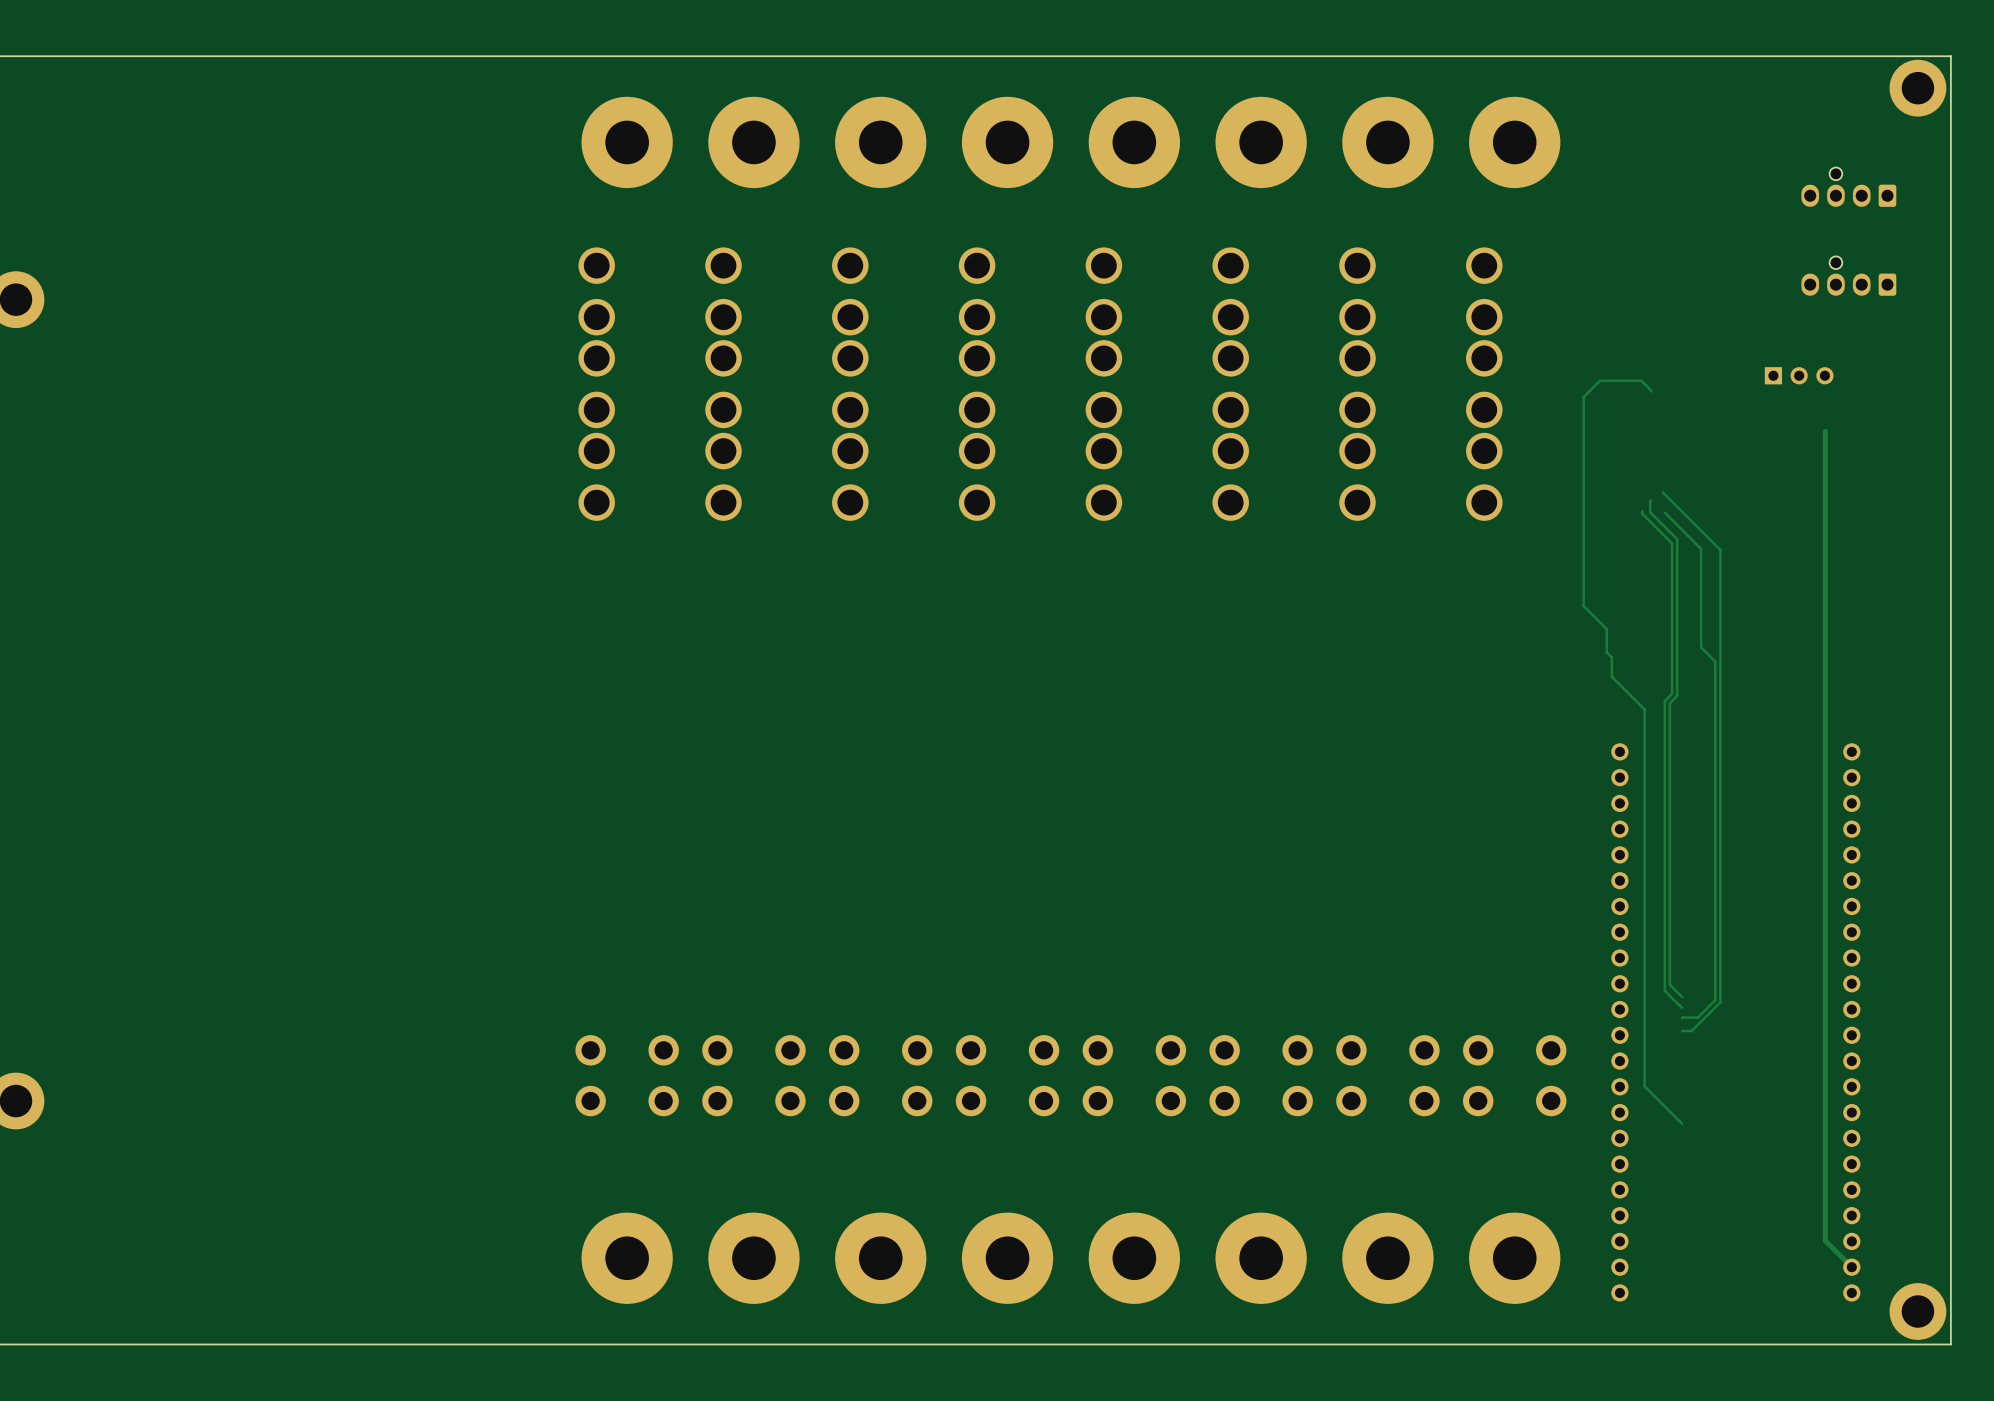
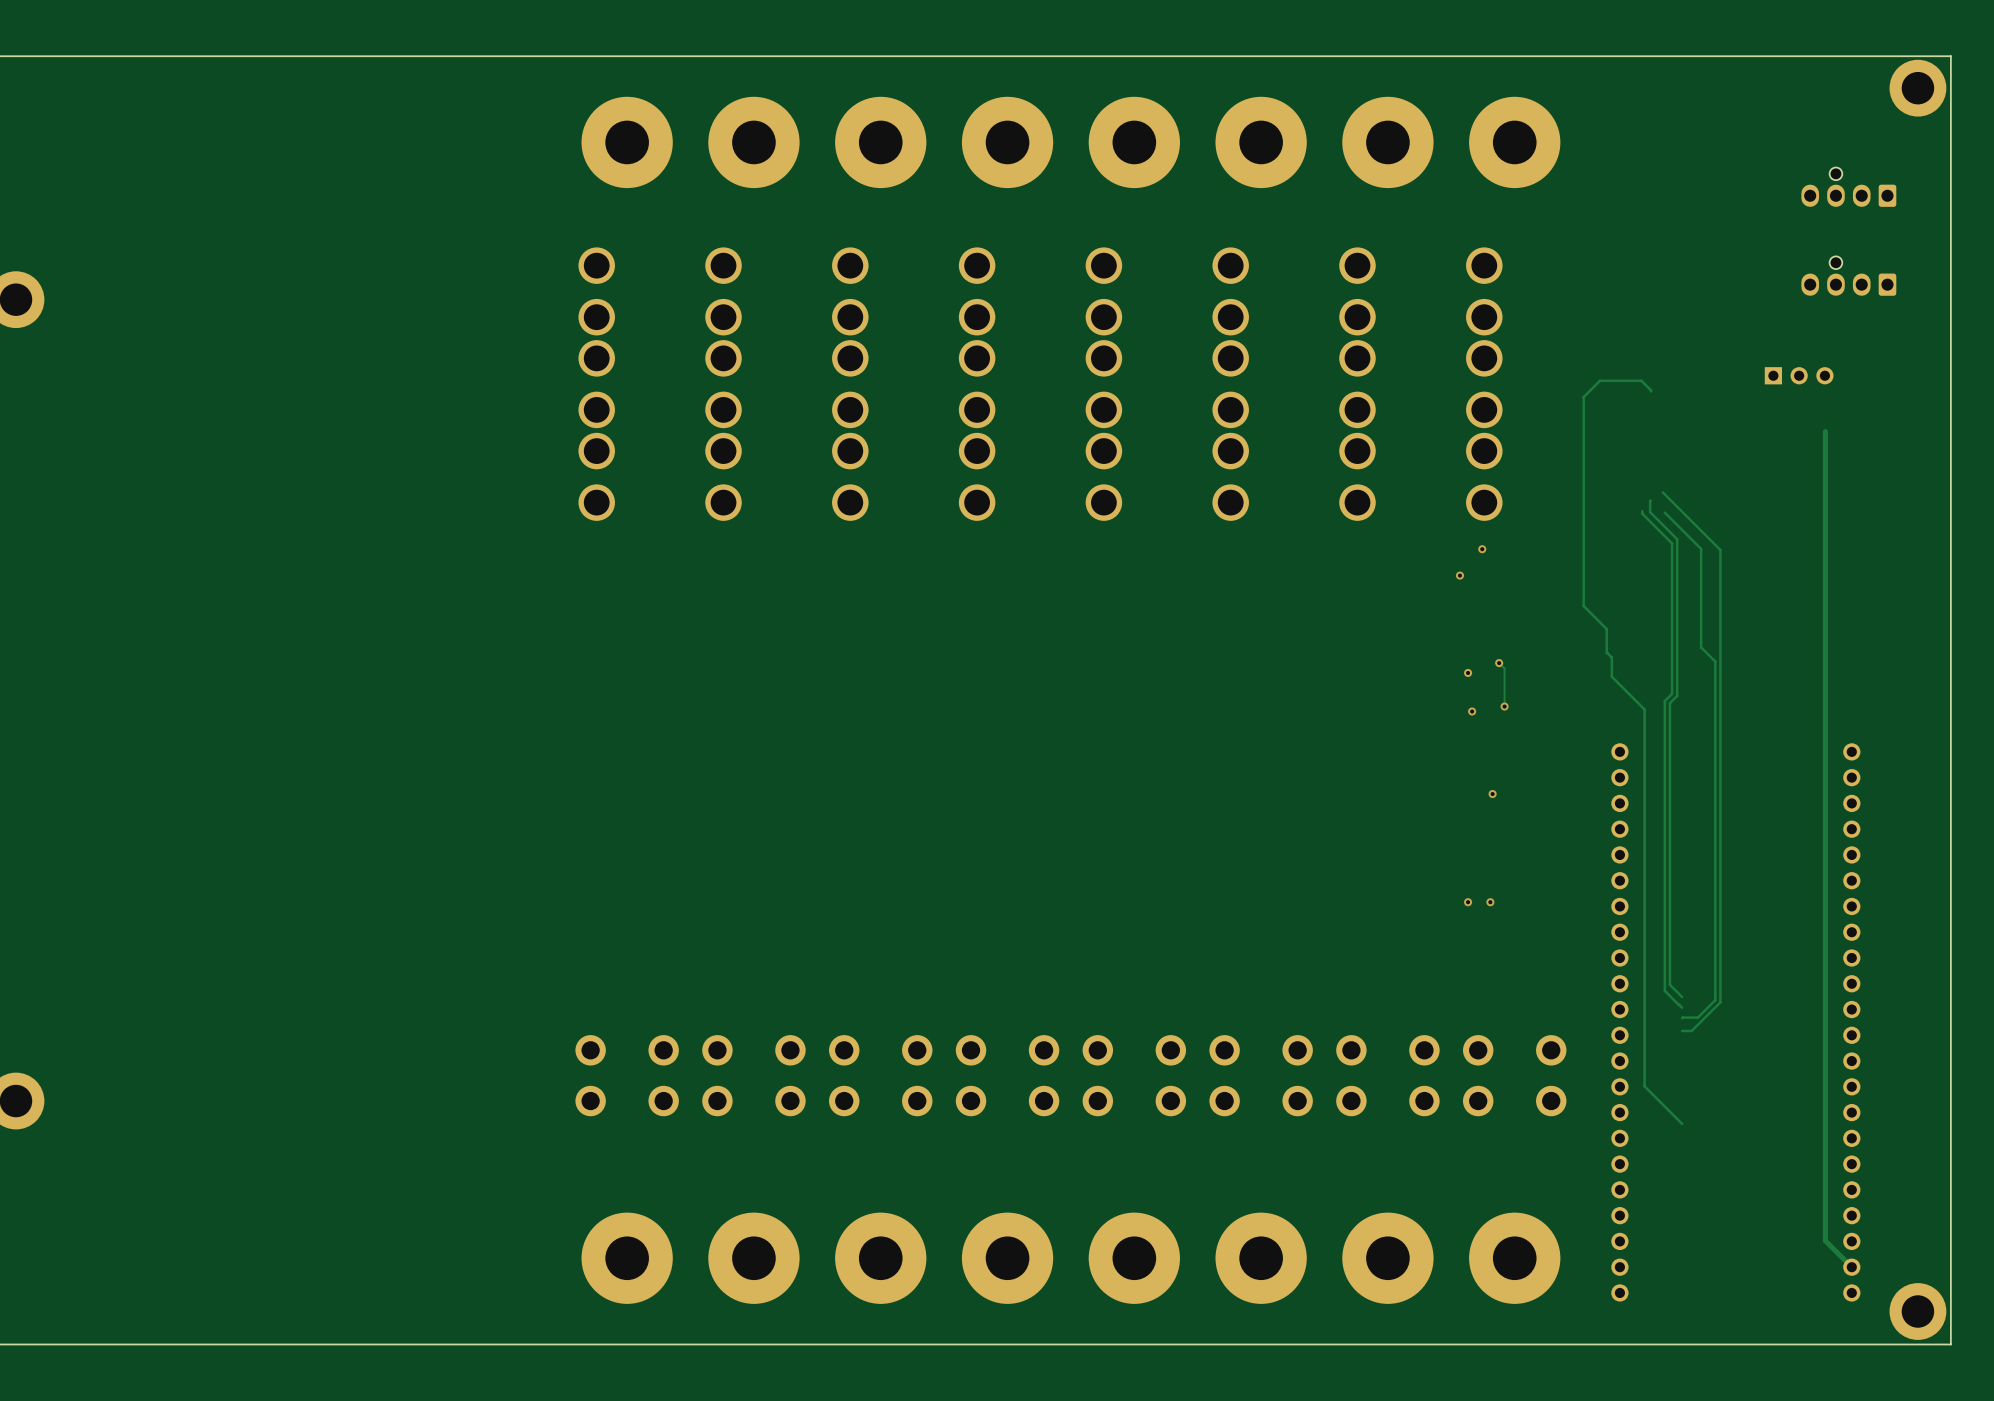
via: none -> (1482, 549)
via: none -> (1459, 575)
track: none -> (1499, 663) (1504, 668) (1504, 706)
via: none -> (1499, 663)
via: none -> (1468, 672)
via: none -> (1504, 706)
via: none -> (1472, 711)
via: none -> (1492, 794)
via: none -> (1468, 902)
via: none -> (1490, 902)

